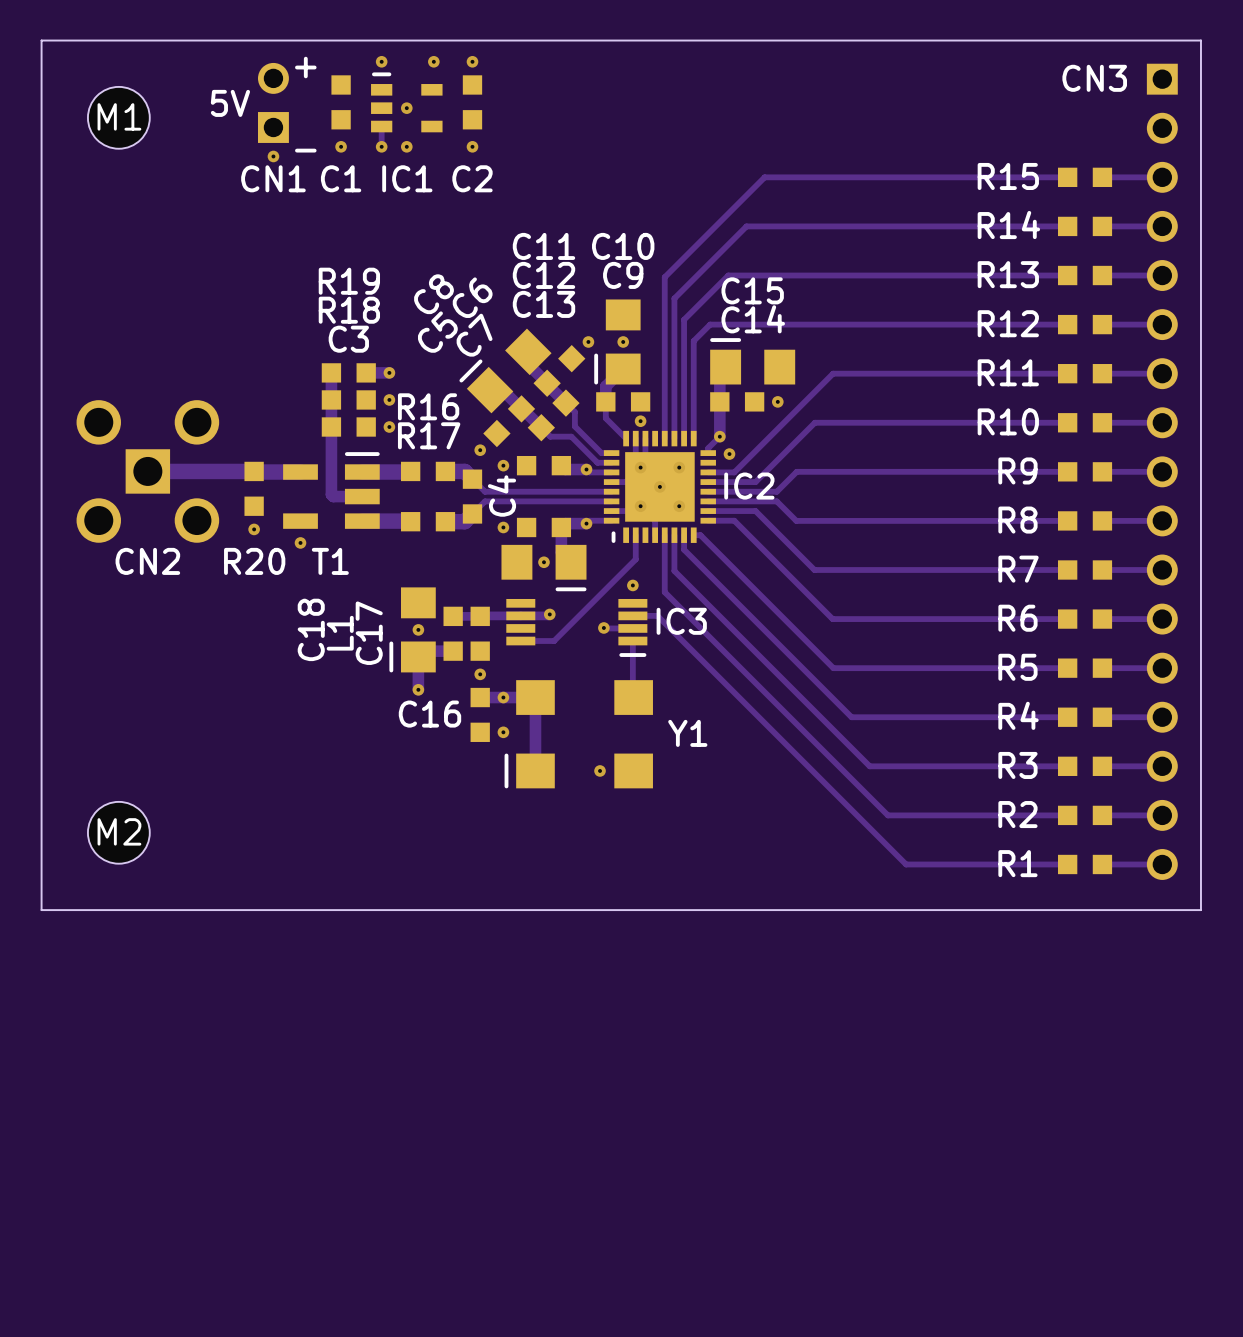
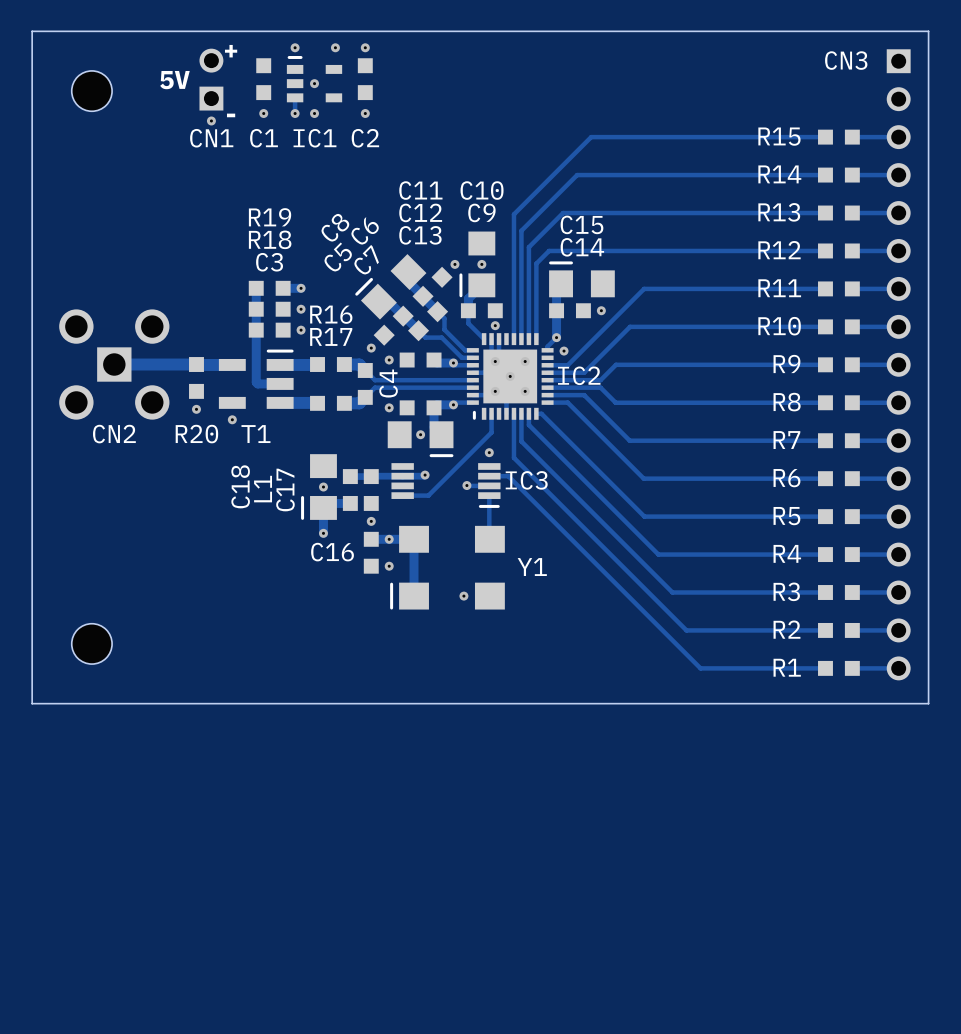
M1: (118, 117) -> none
part: none -> (91, 91)
M2: (118, 832) -> none
part: none -> (91, 643)

